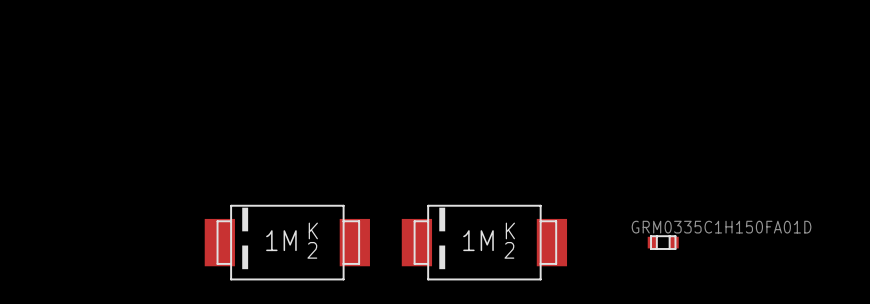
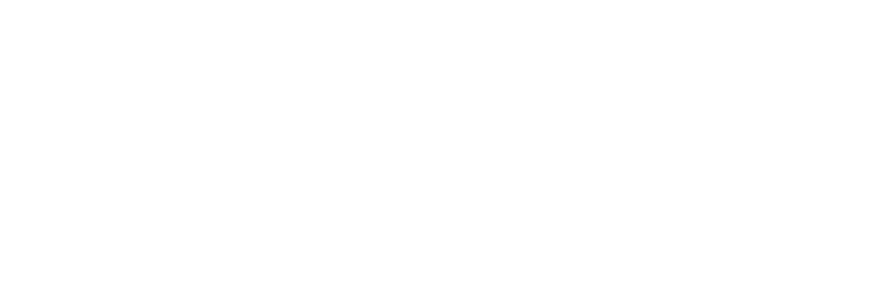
part: (287, 242) -> none
part: (484, 242) -> none
part: GRM0335C1H150FA01D (663, 242) -> none

